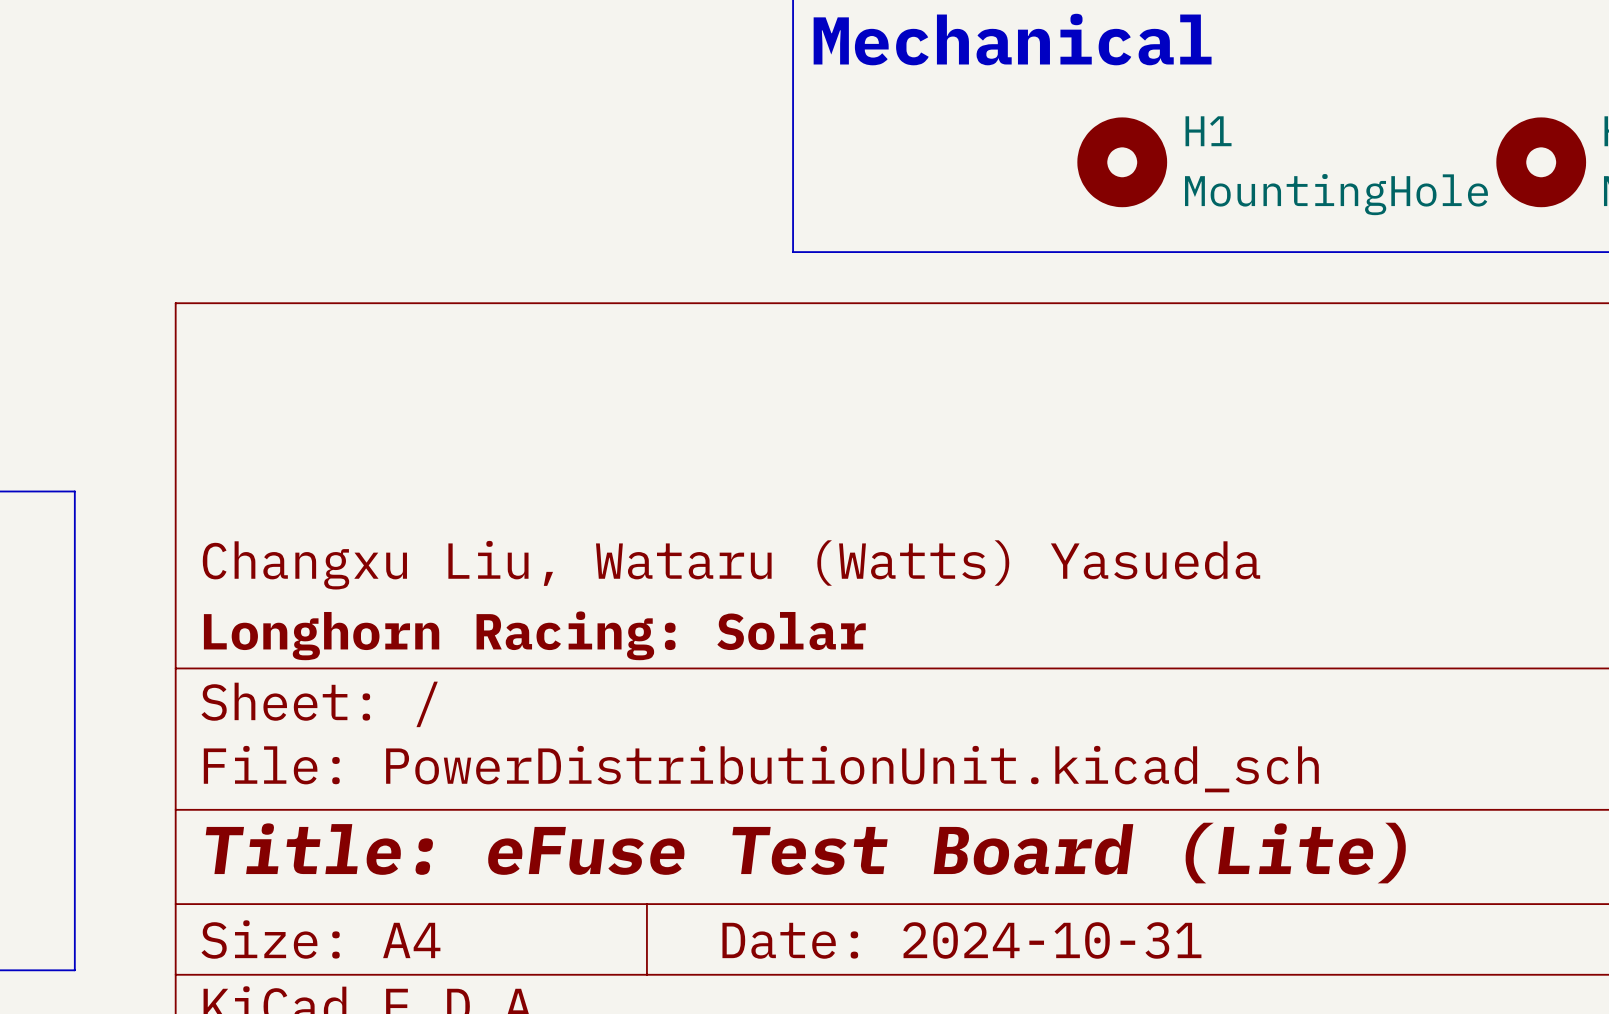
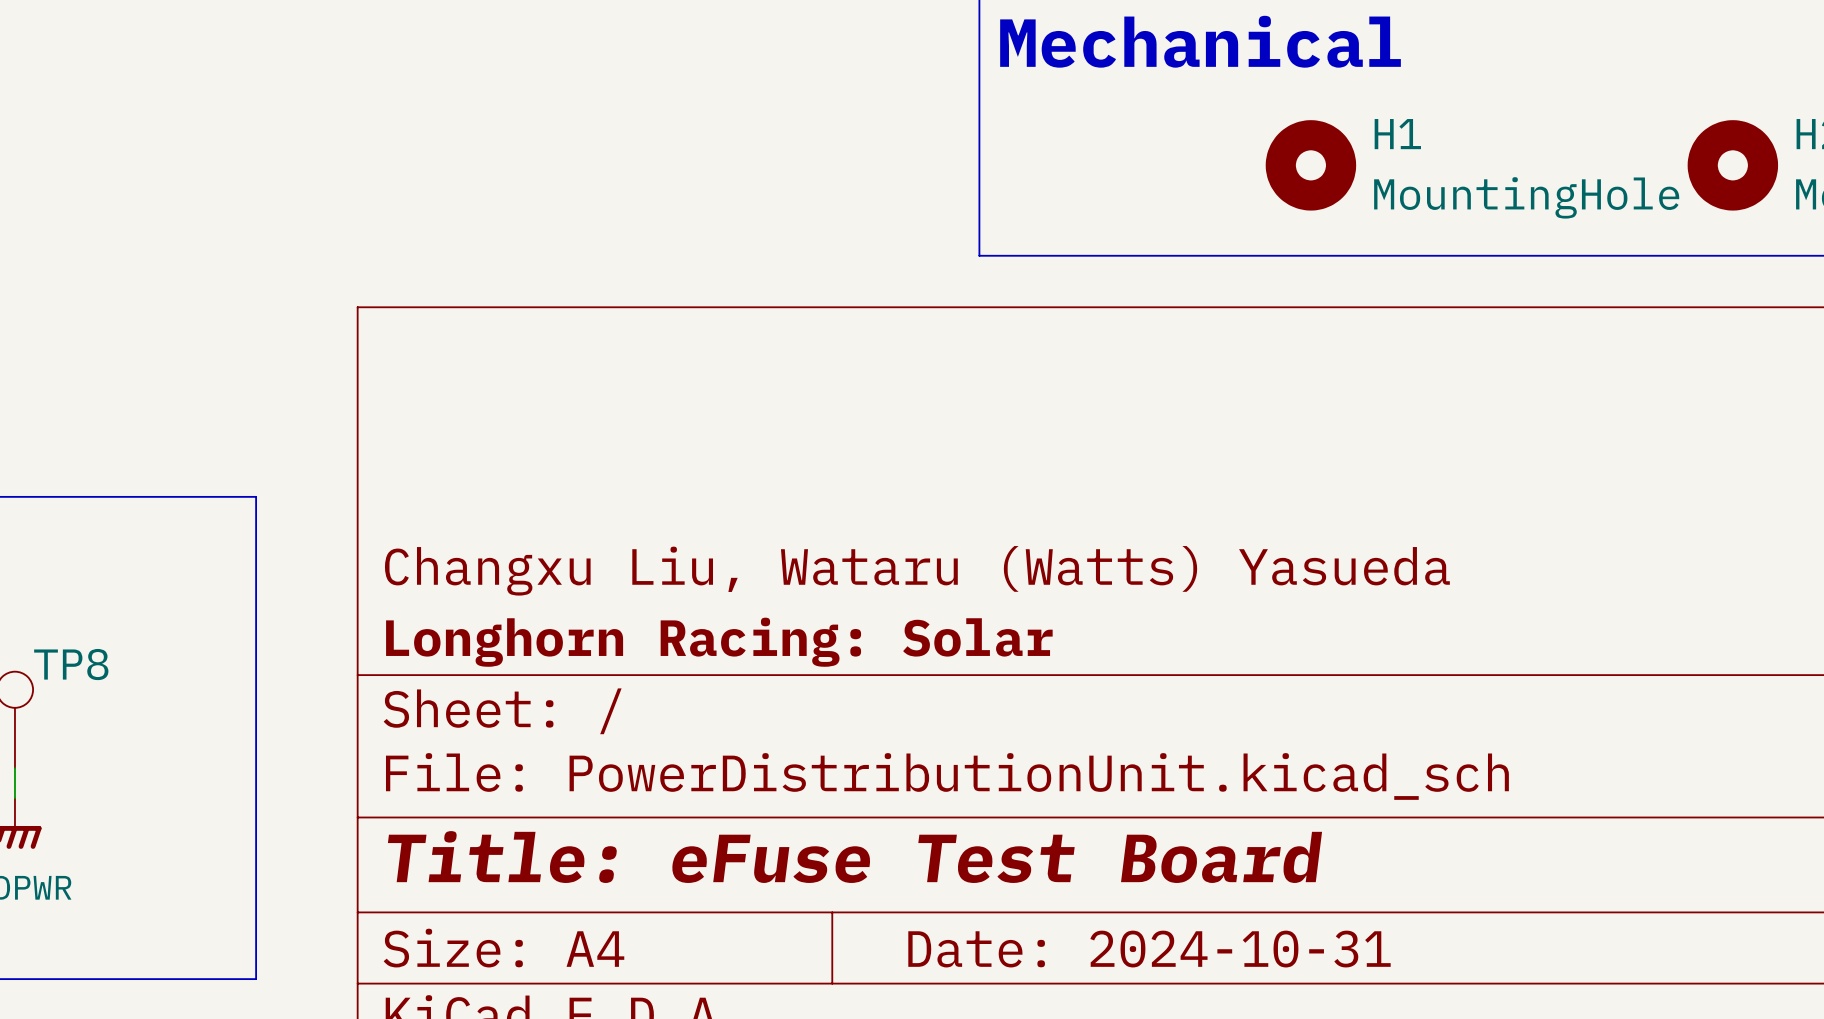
title block: Title: eFuse Test Board (Lite) (805, 853) -> Title: eFuse Test Board (854, 857)

